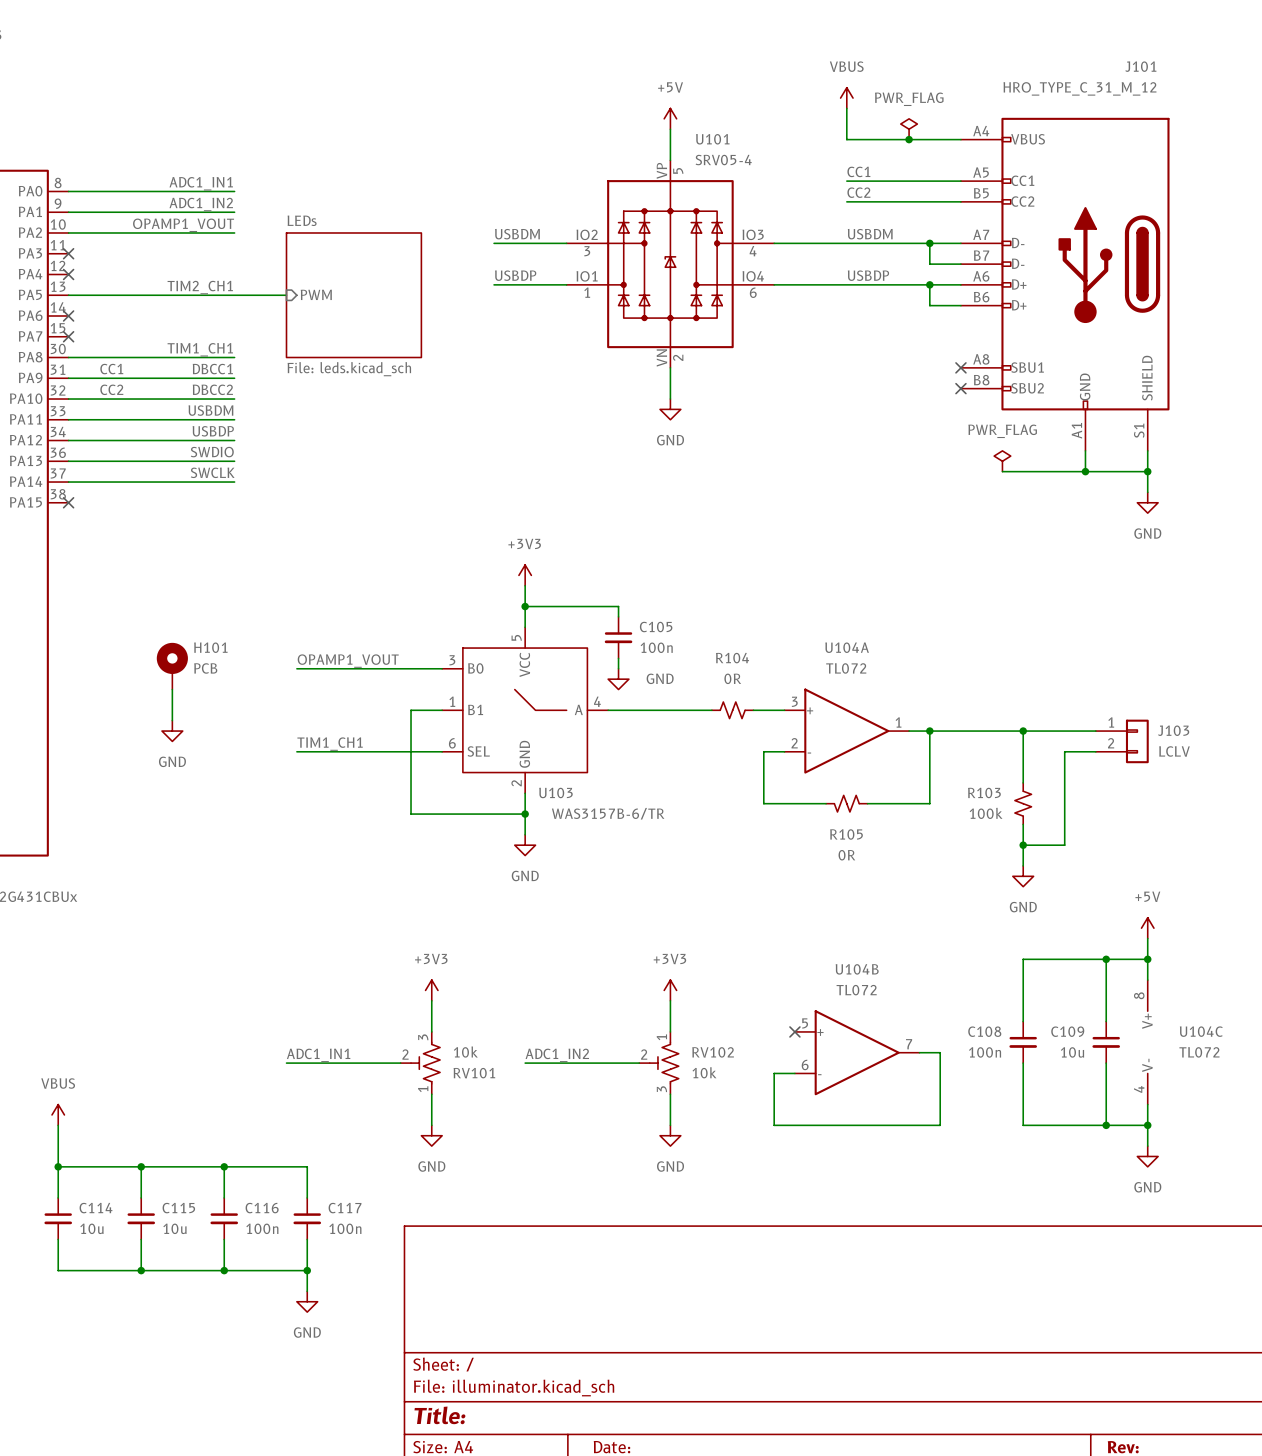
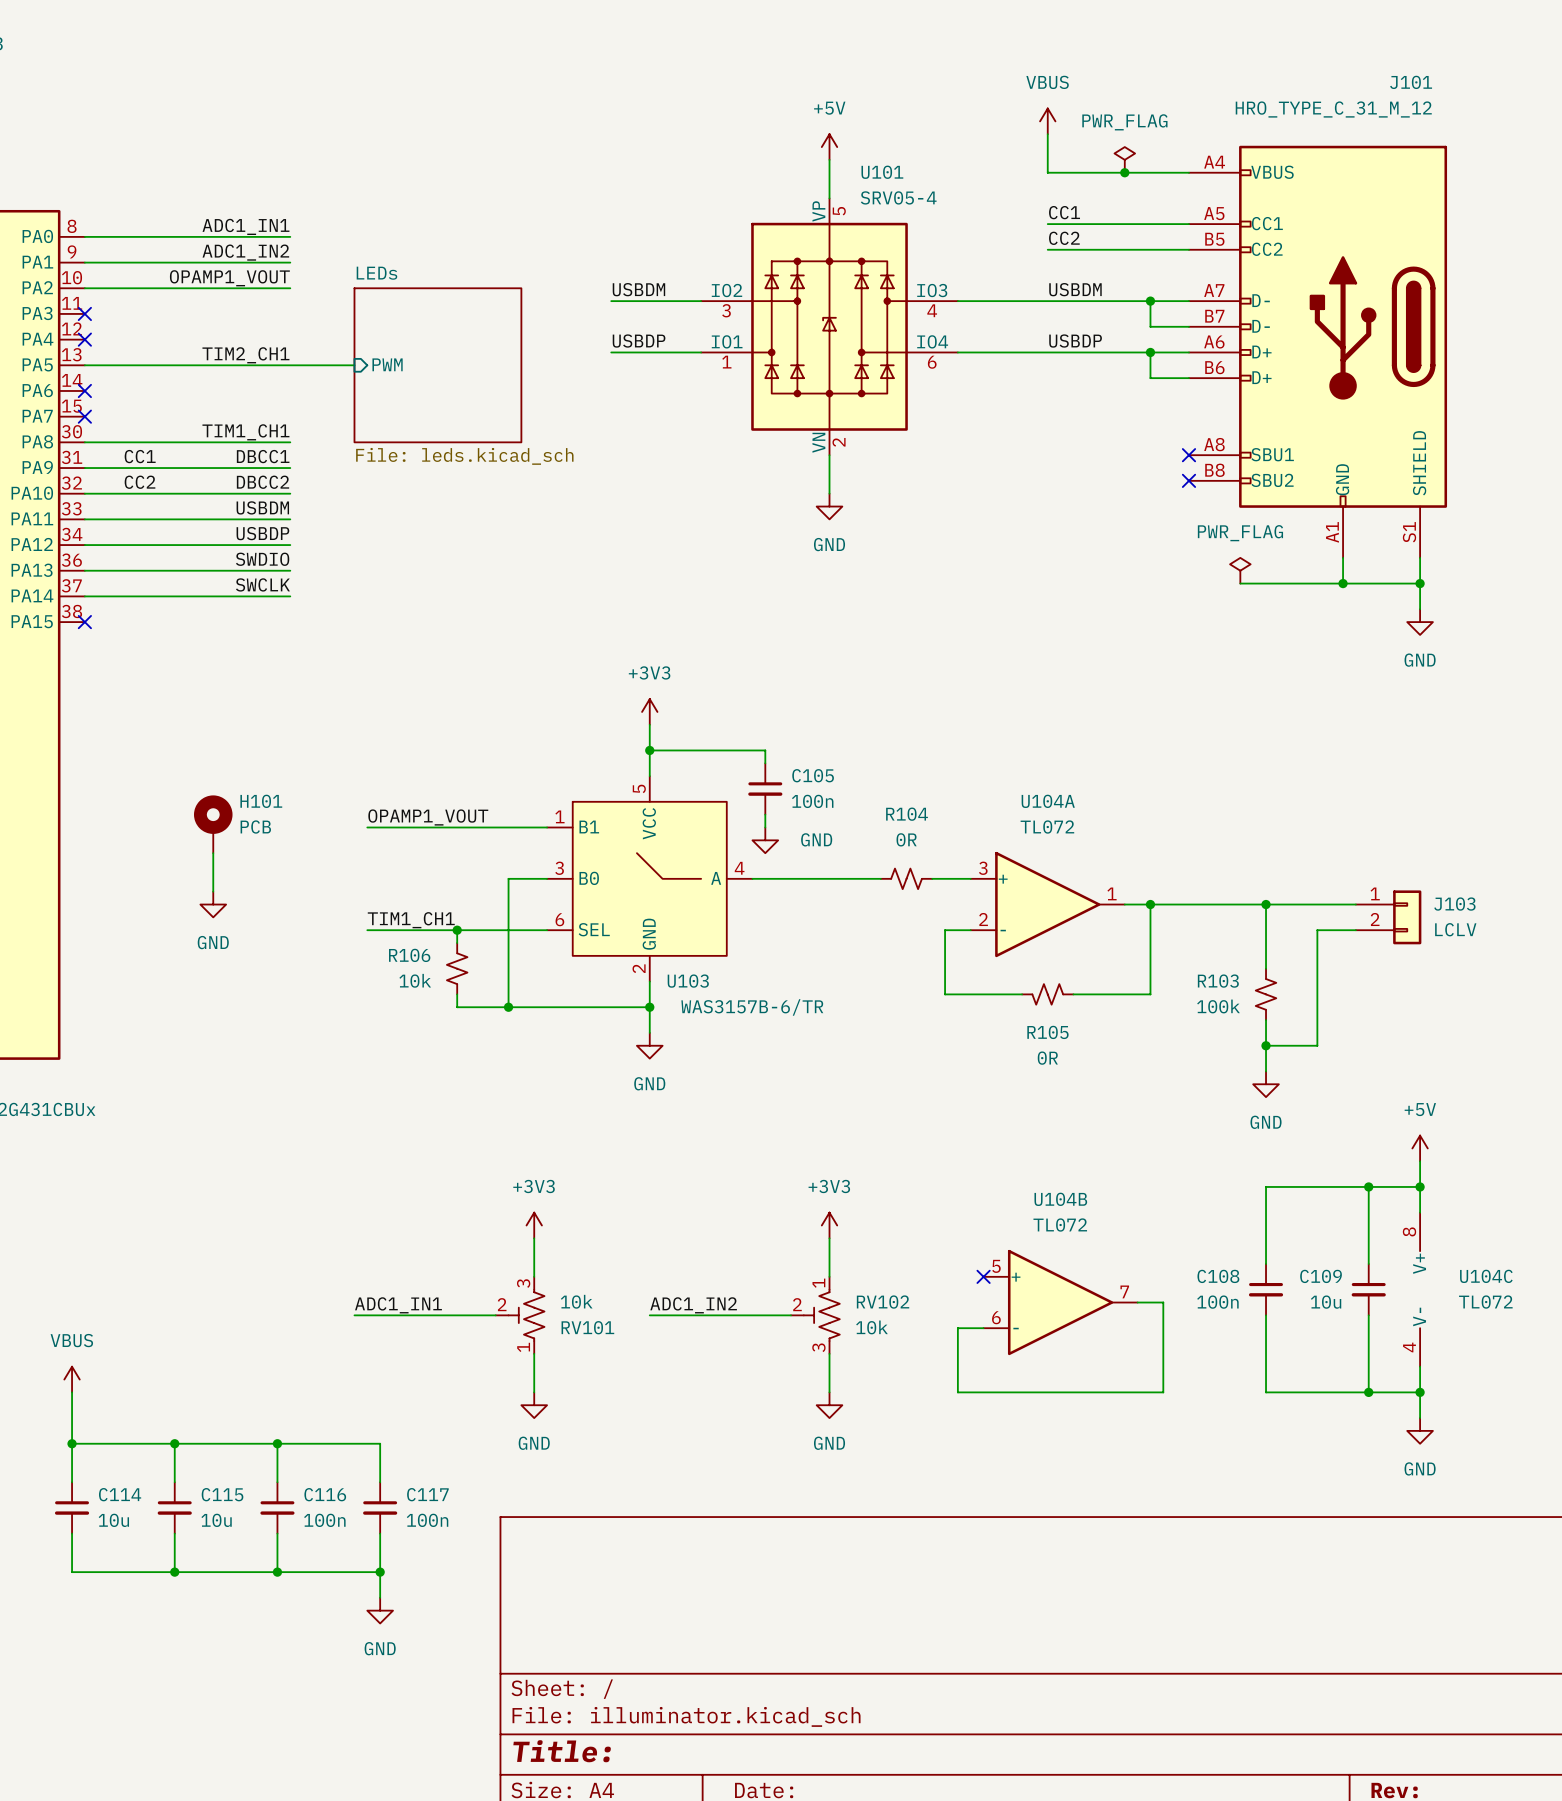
U103 pin number: 3 (452, 660) -> 1 (559, 816)
U103 pin name: B0 (475, 668) -> B1 (589, 827)
U103 pin number: 1 (452, 701) -> 3 (559, 868)
U103 pin name: B1 (475, 709) -> B0 (589, 878)
wire: none -> (457, 930) (457, 943)
junction: none -> (457, 930)
R106: none -> 10k (457, 968)
wire: none -> (457, 994) (457, 1007) (508, 1007)
junction: none -> (508, 1007)

